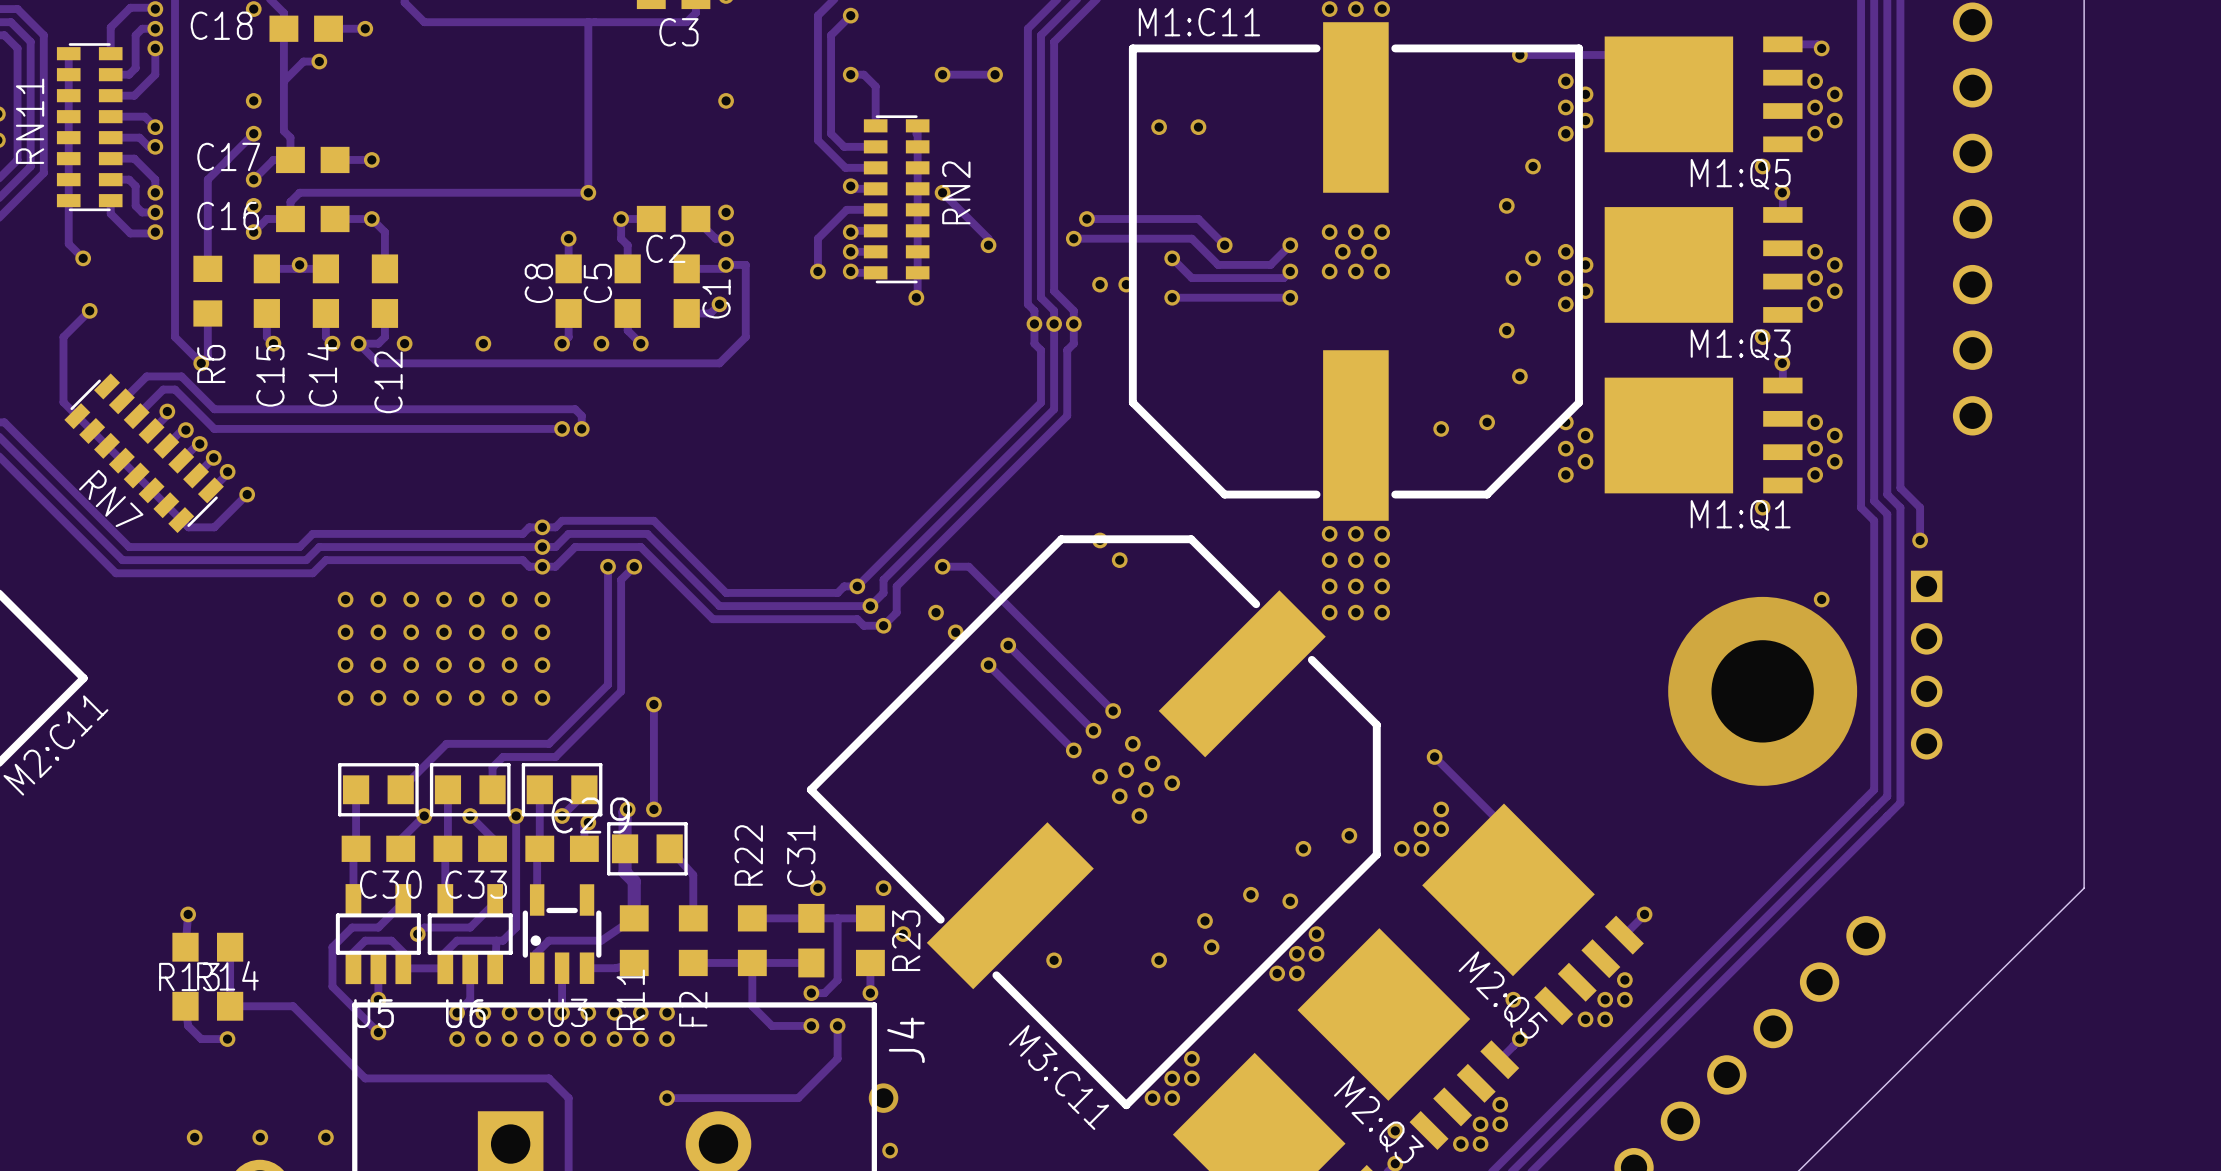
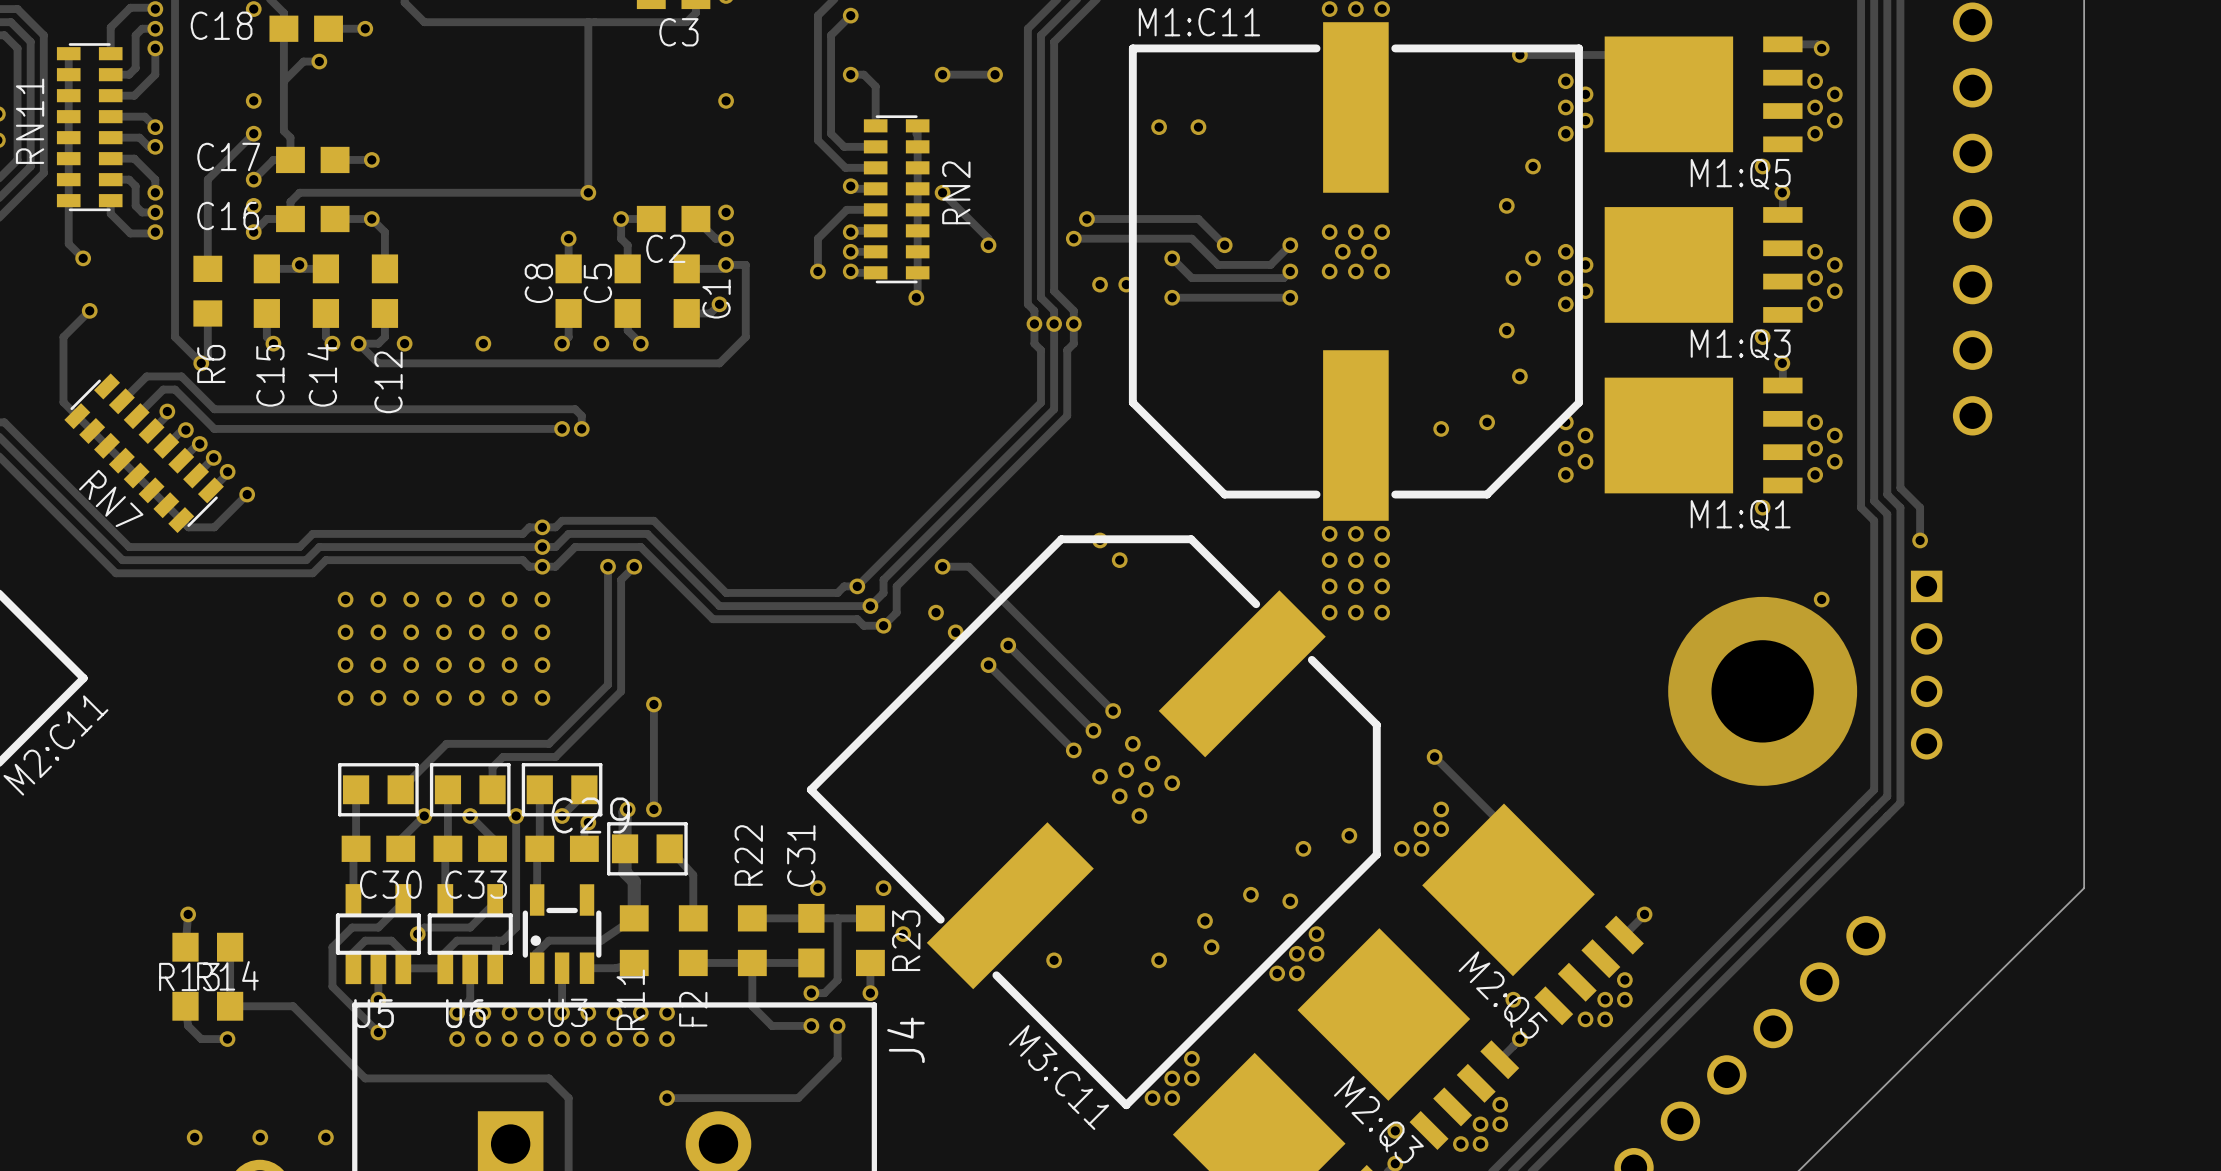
via: (883, 1098) -> none
via: (890, 1150) -> none

